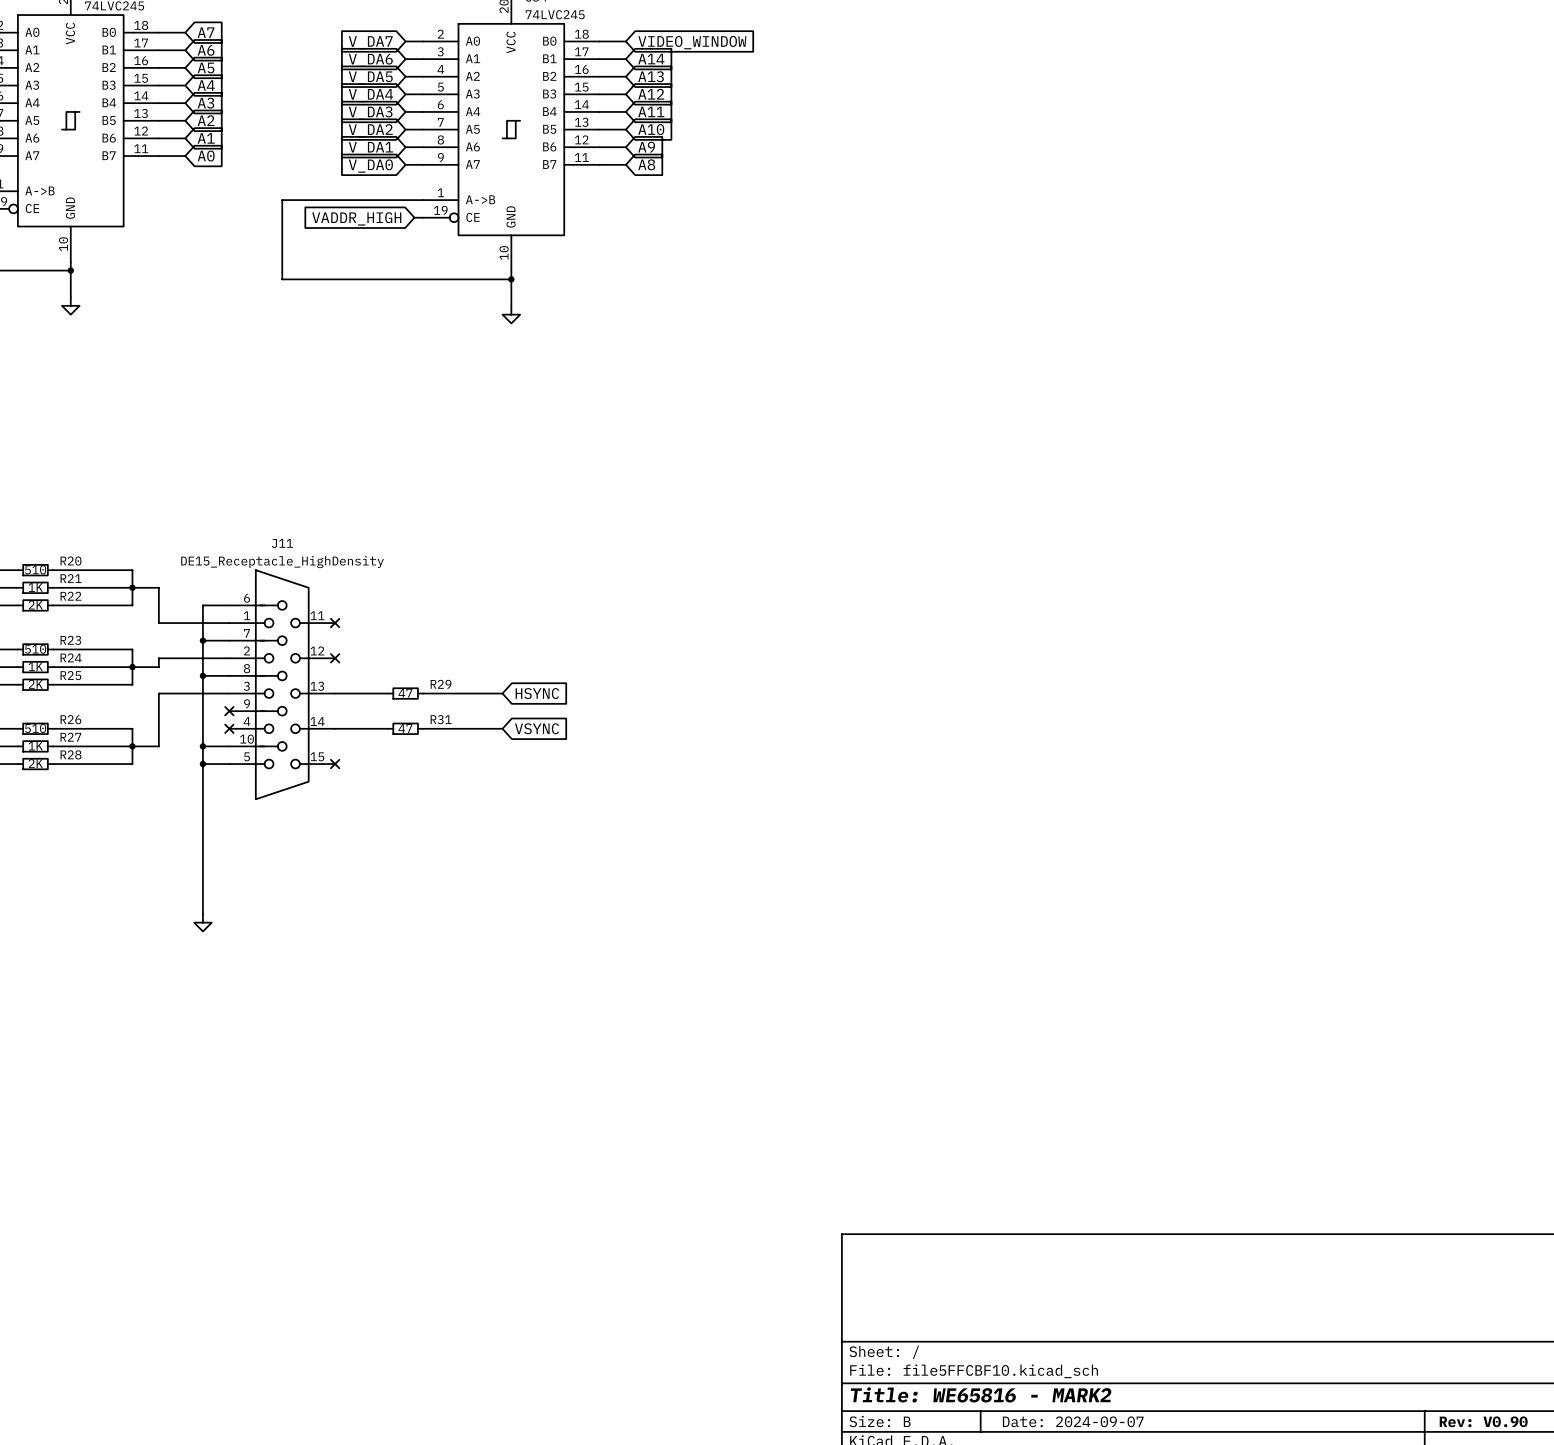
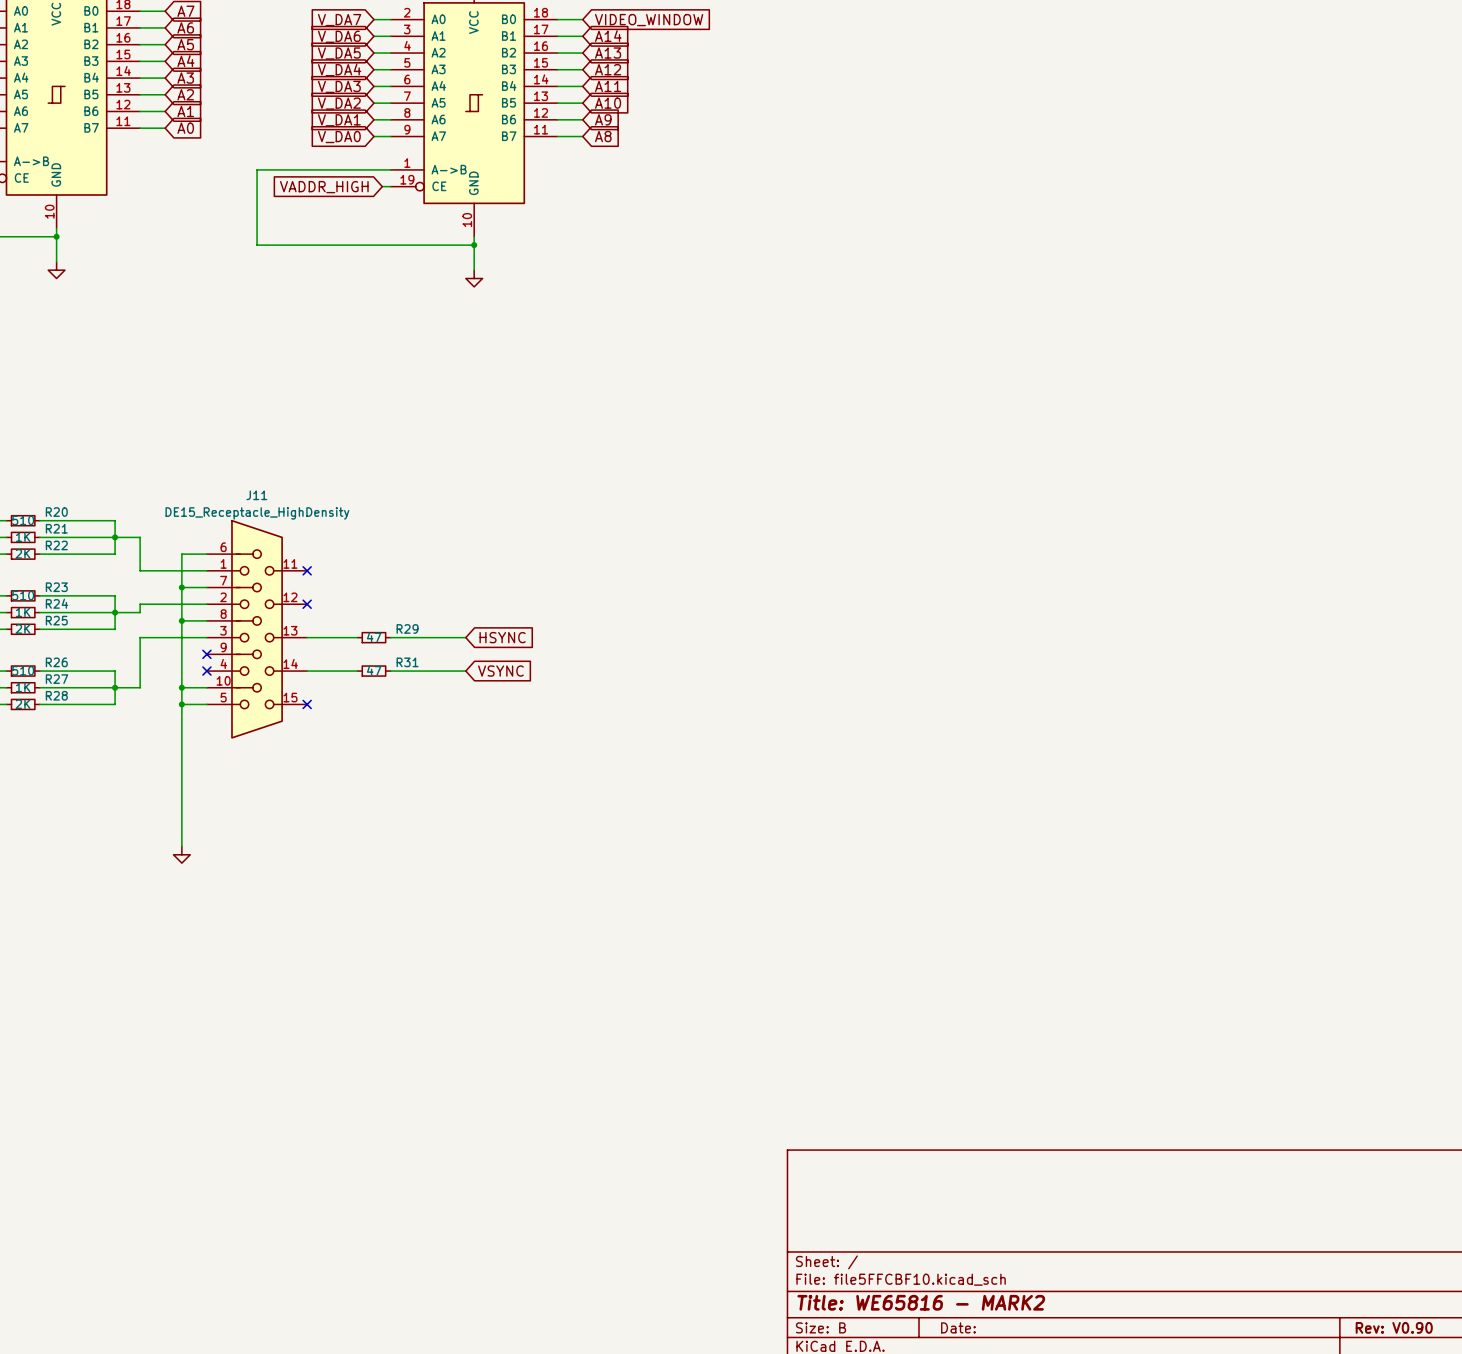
title block: Date: 2024-09-07 (1073, 1421) -> Date: (958, 1327)

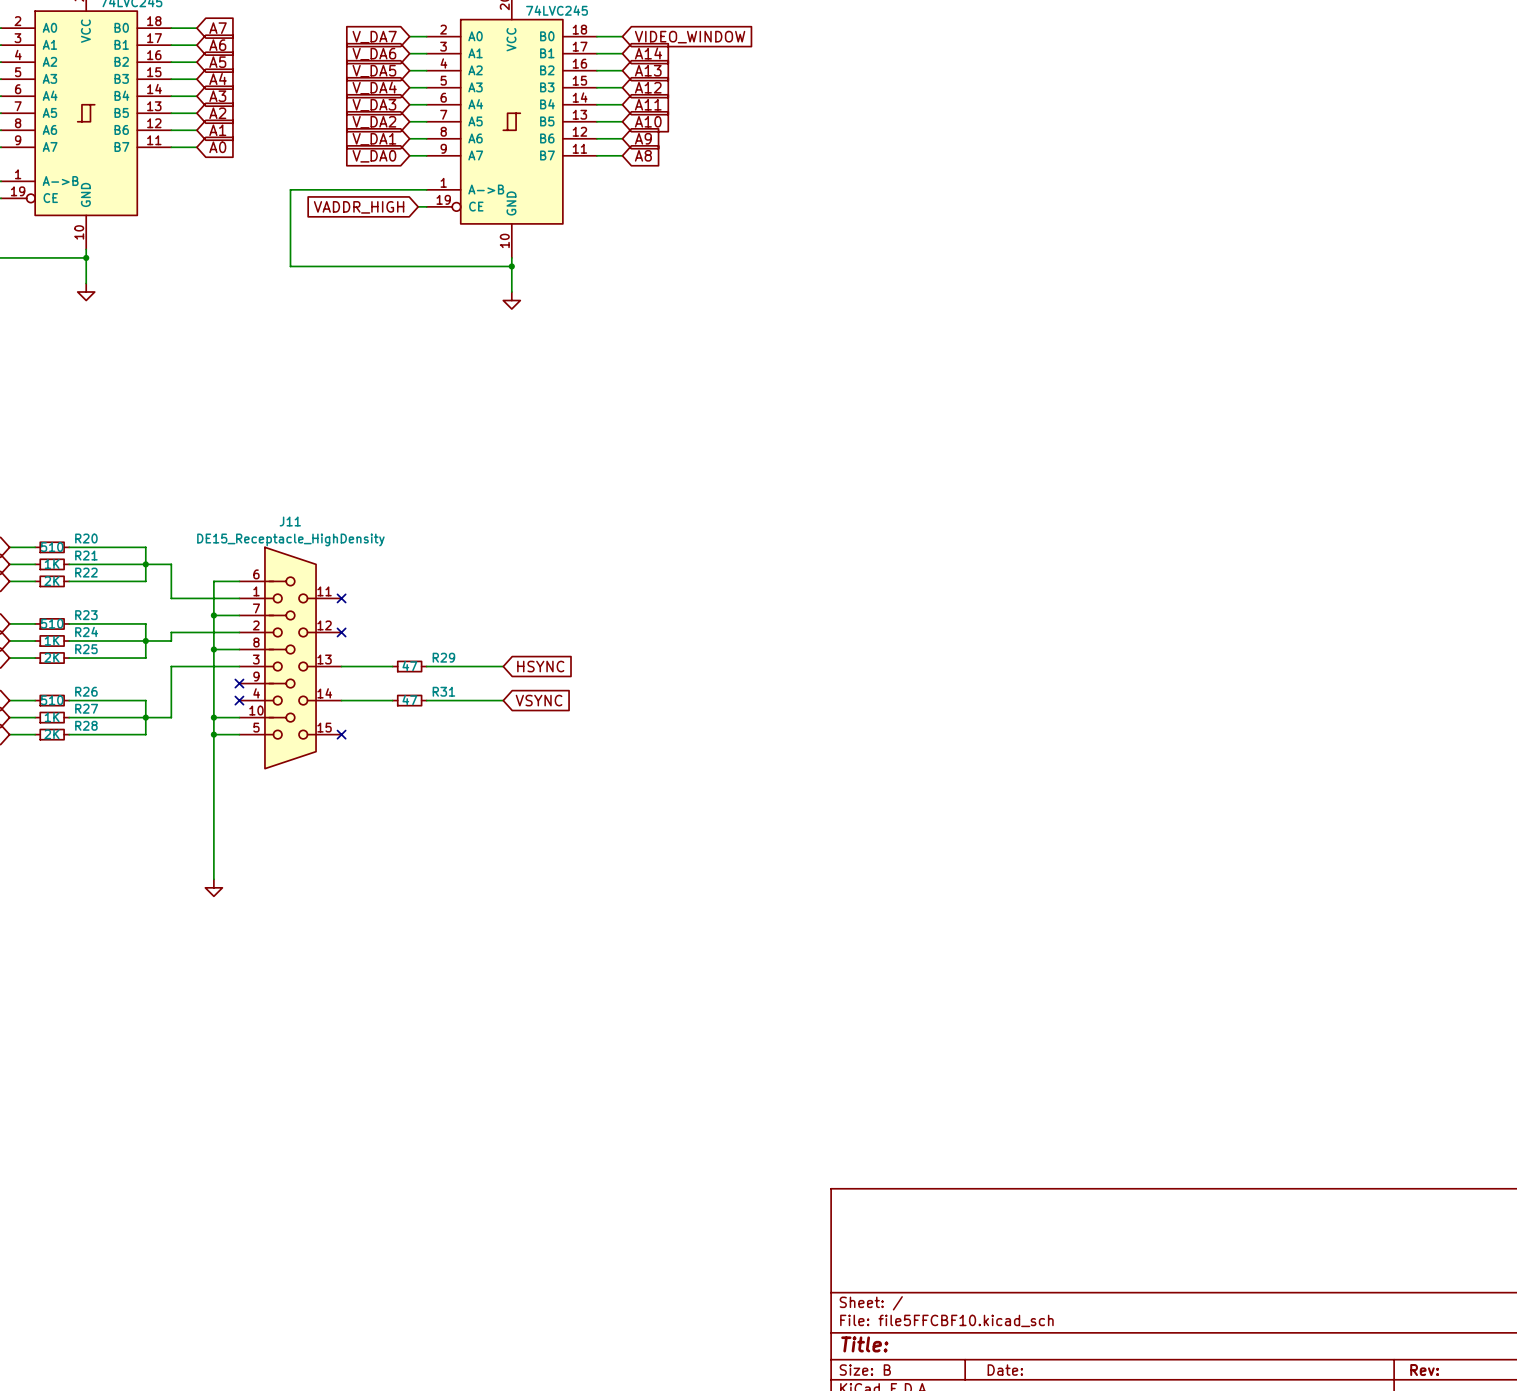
title block: Title: WE65816 - MARK2 (921, 1302) -> Title: (864, 1344)
title block: Rev: V0.90 (1394, 1327) -> Rev: (1424, 1370)

